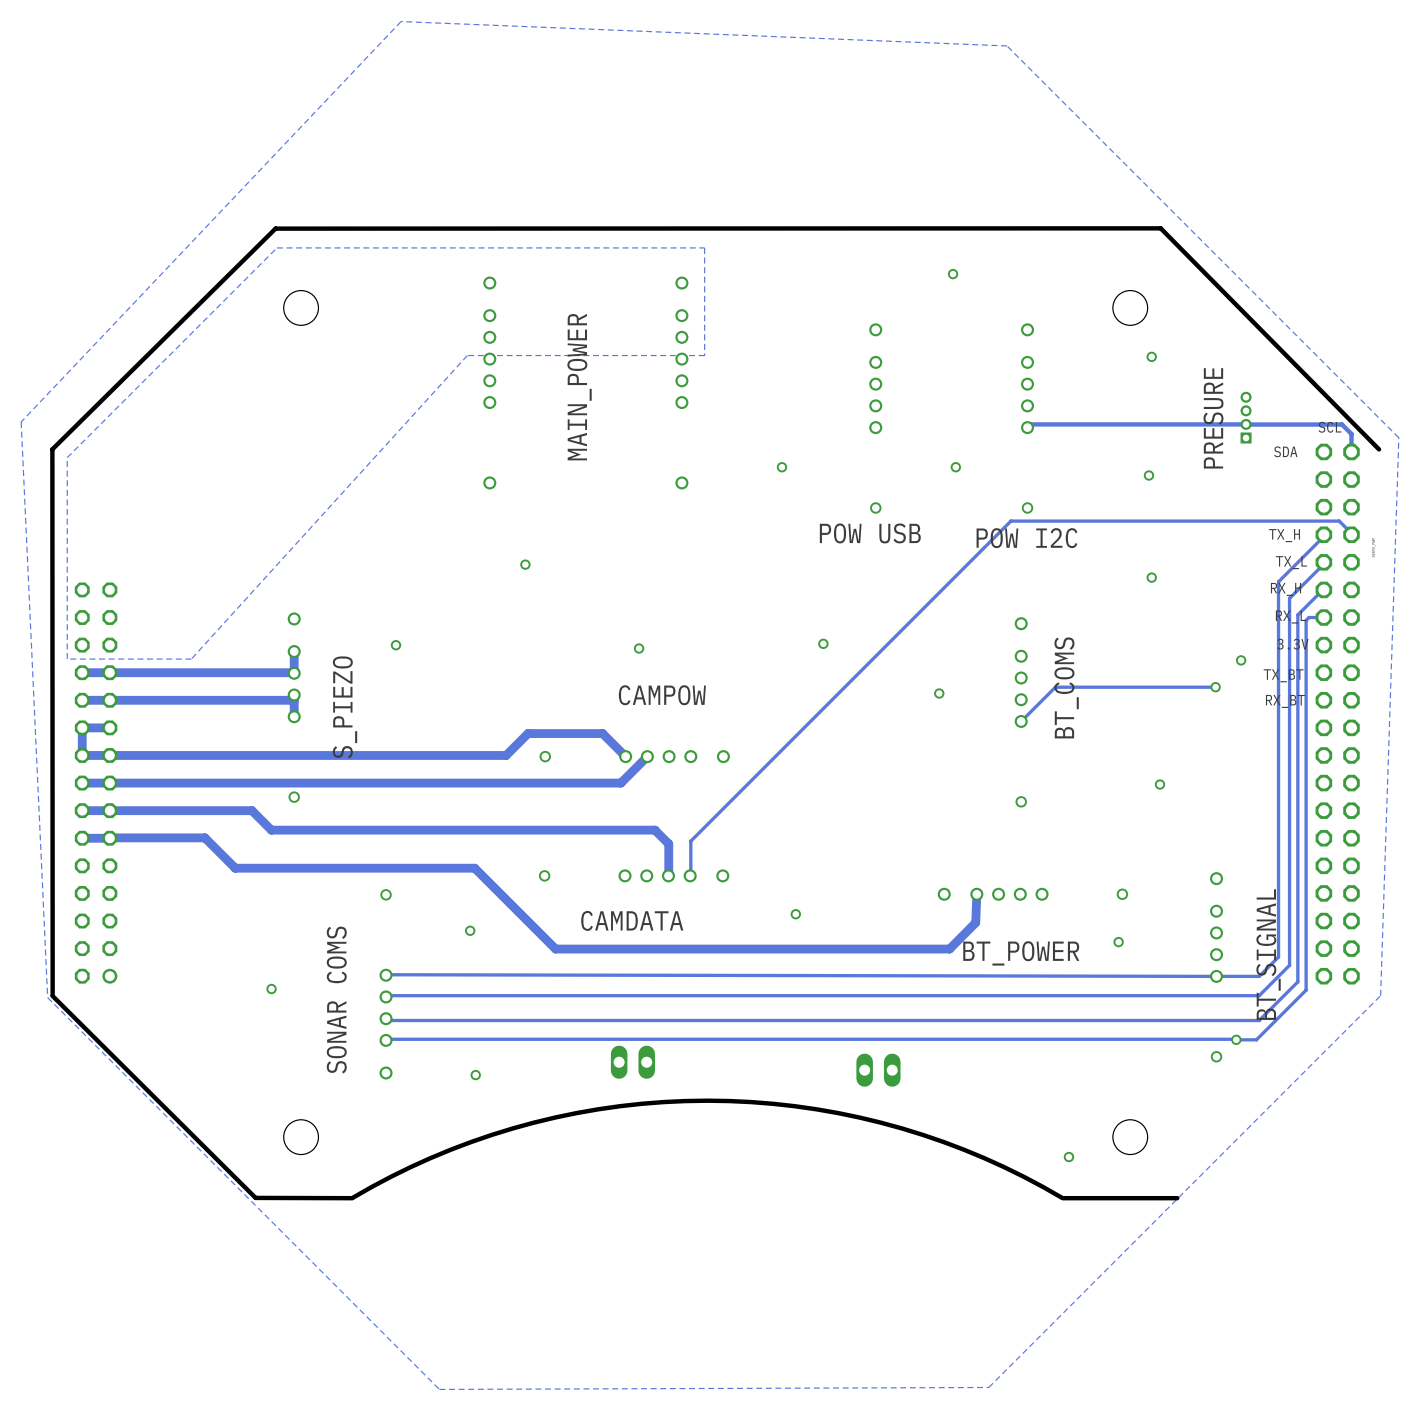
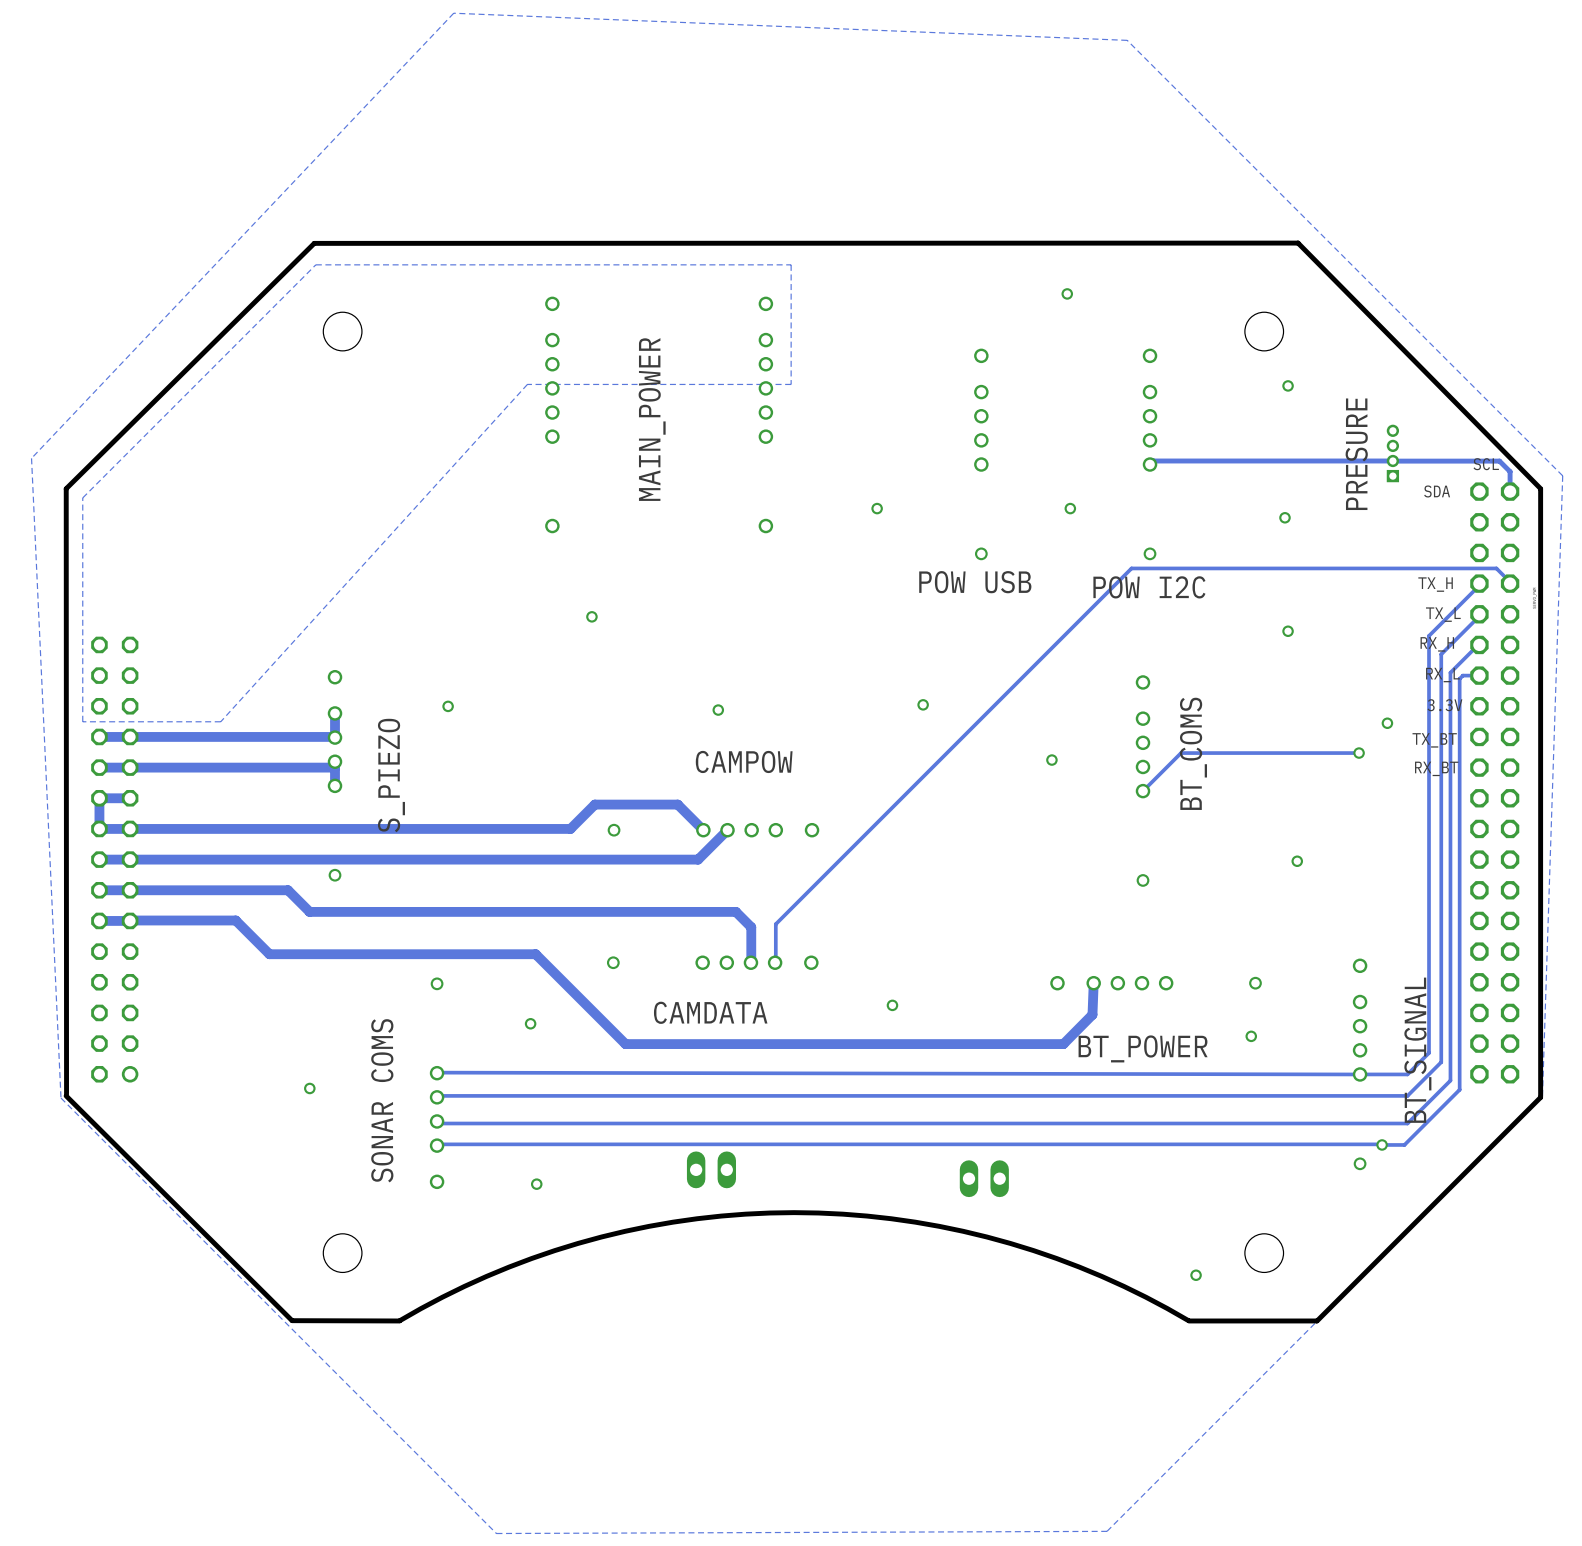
board edge: none -> (1540, 489) (1540, 1097) (1317, 1320)

